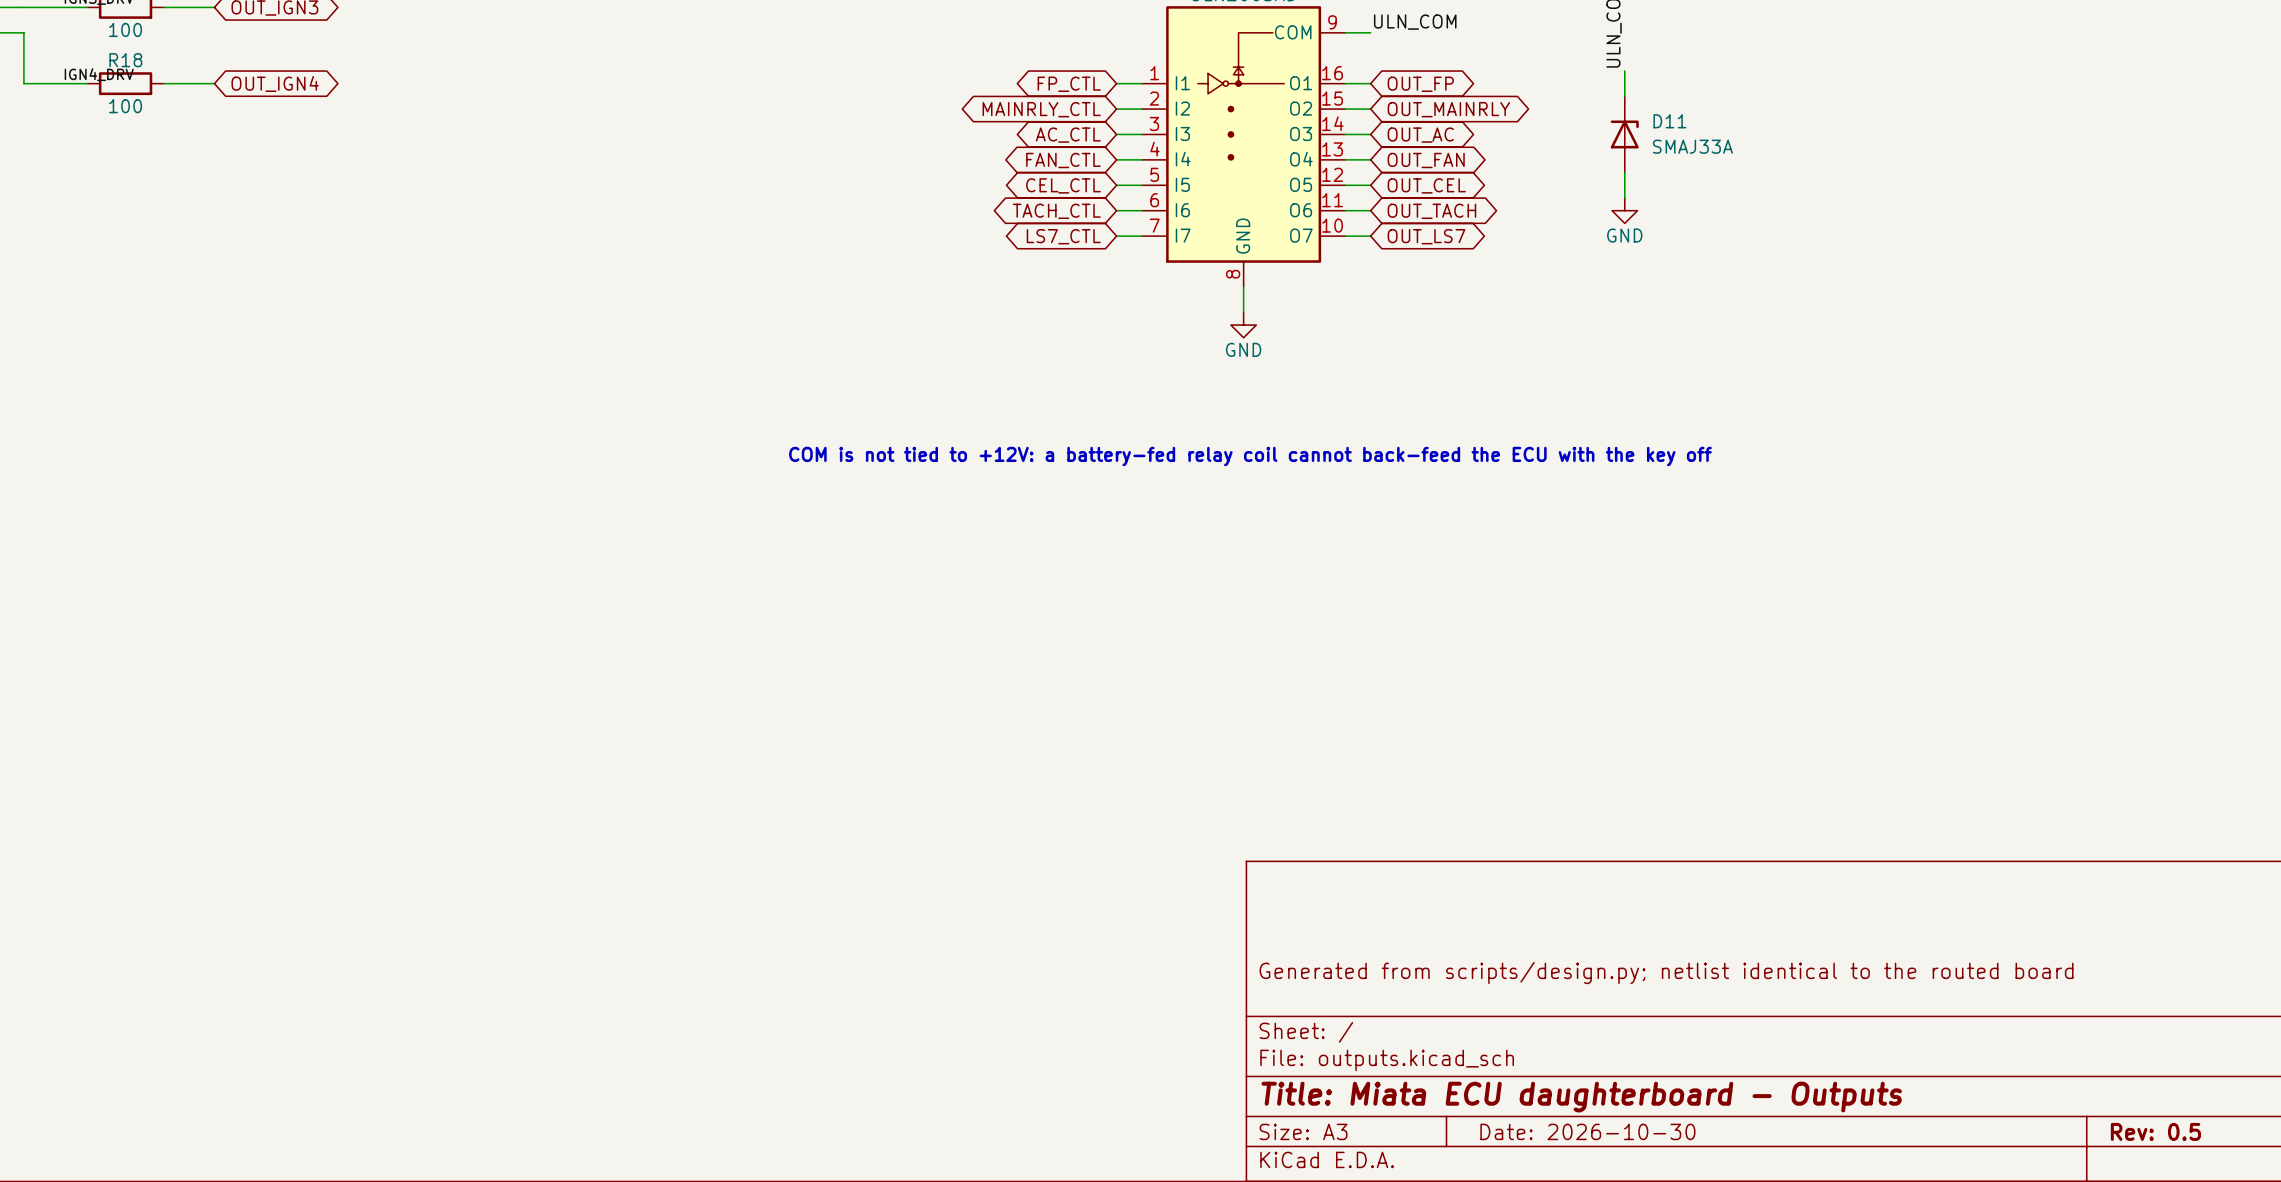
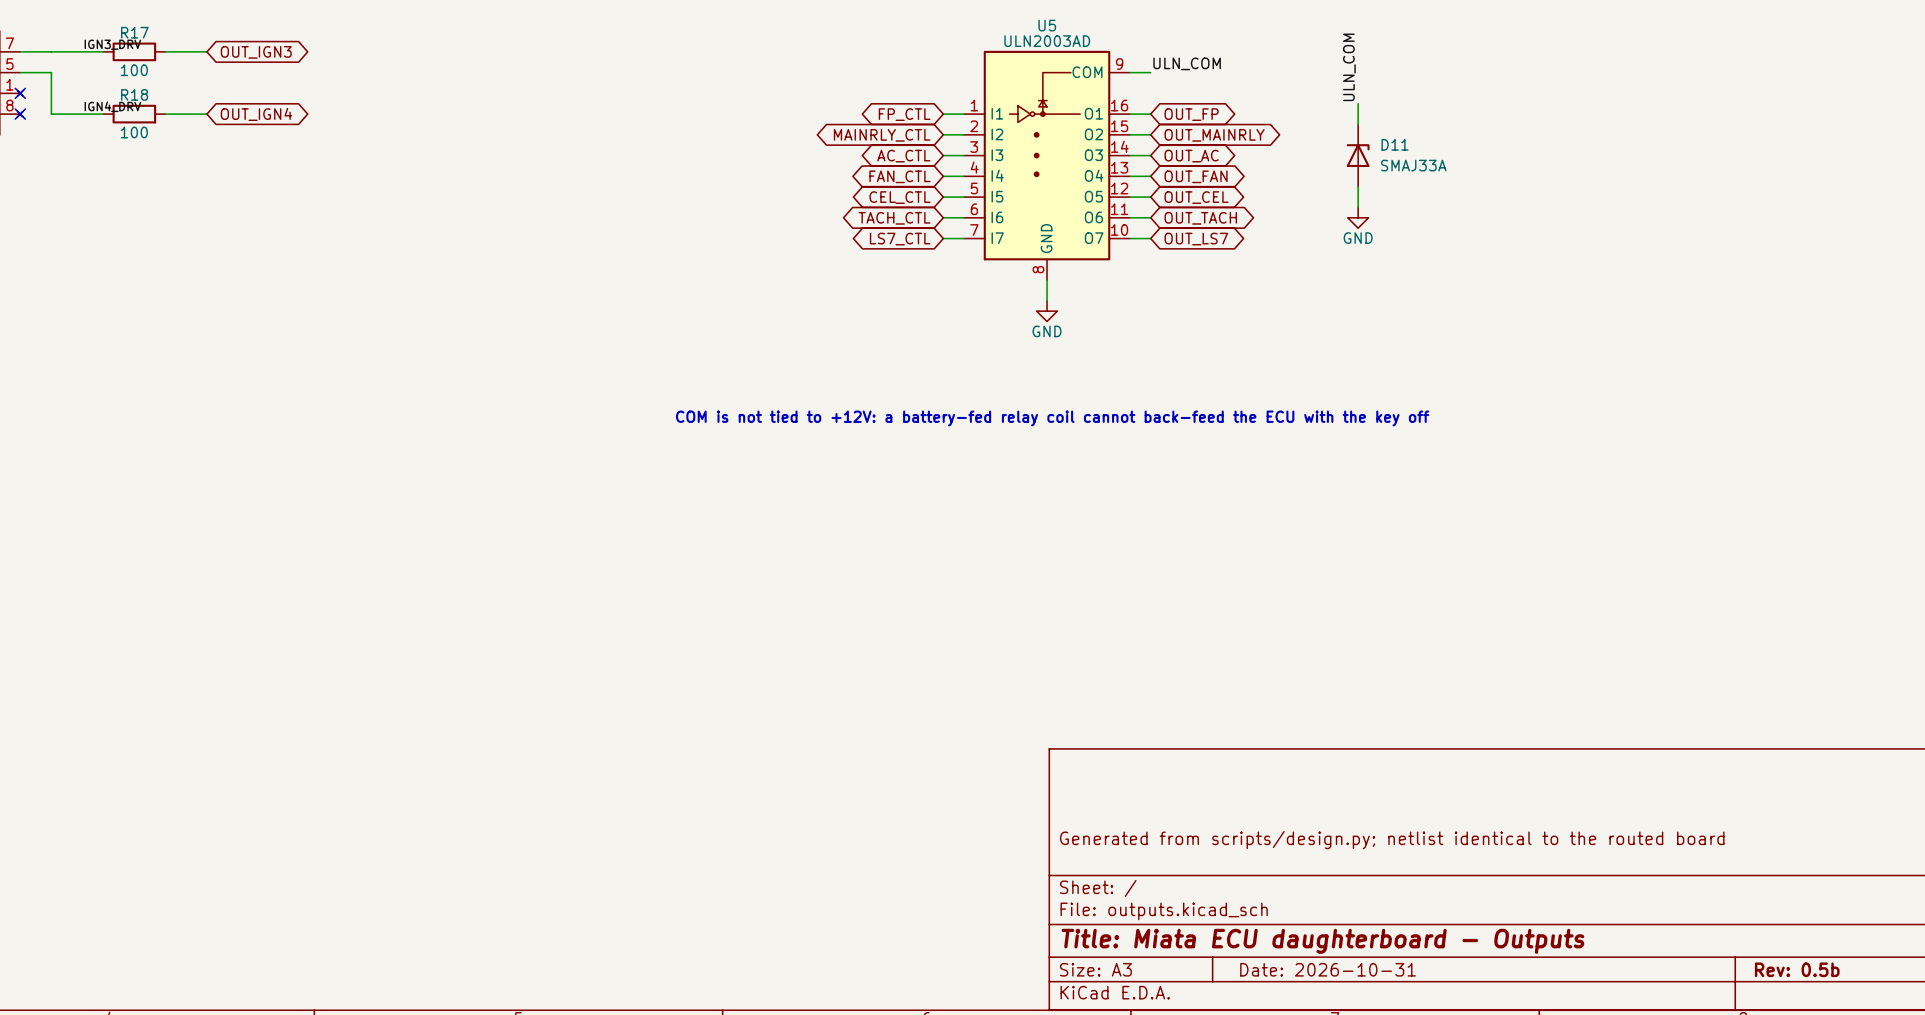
title block: Date: 2026-10-30 (1587, 1131) -> Date: 2026-10-31 (1328, 969)
title block: Rev: 0.5 (2155, 1131) -> Rev: 0.5b (1797, 969)

